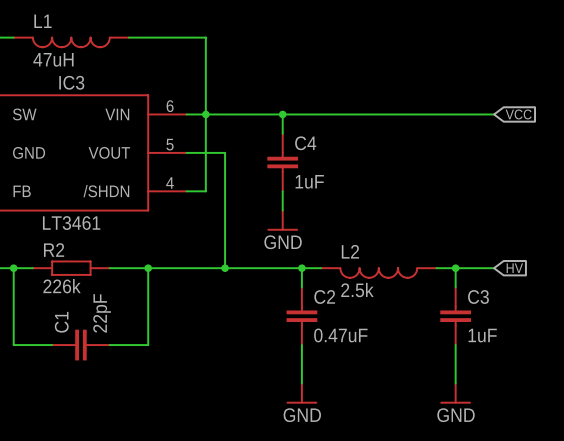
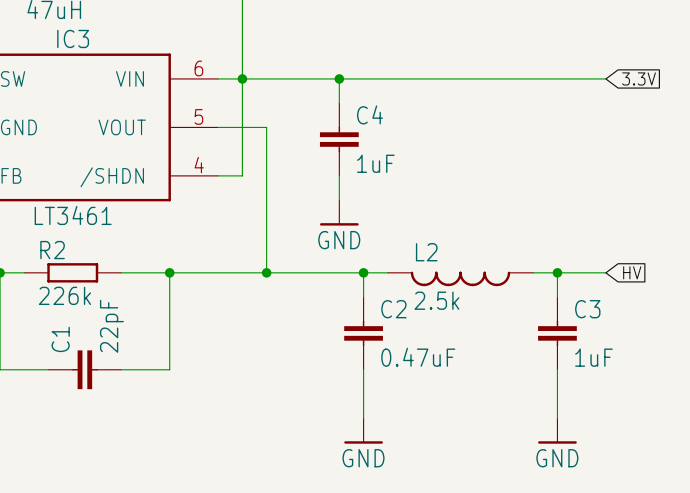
global label: VCC (518, 114) -> 3.3V (639, 78)

